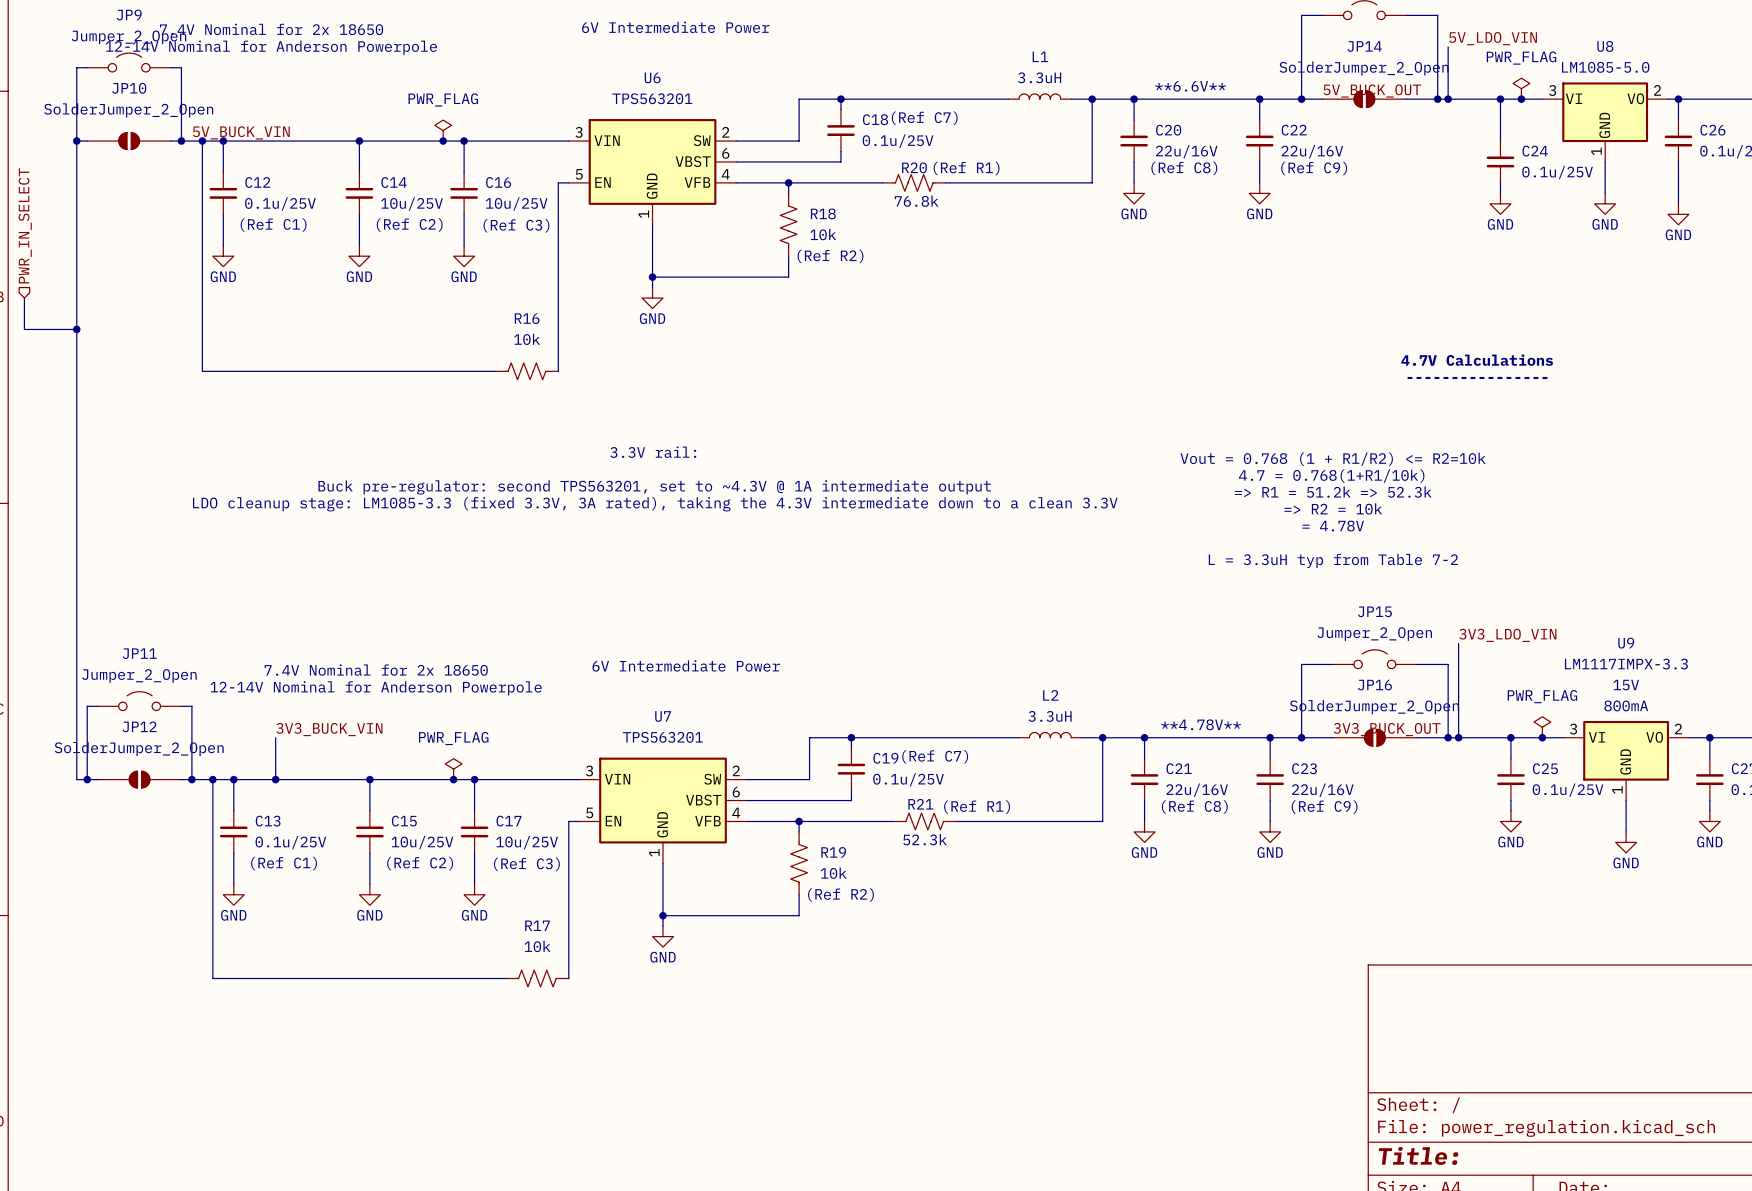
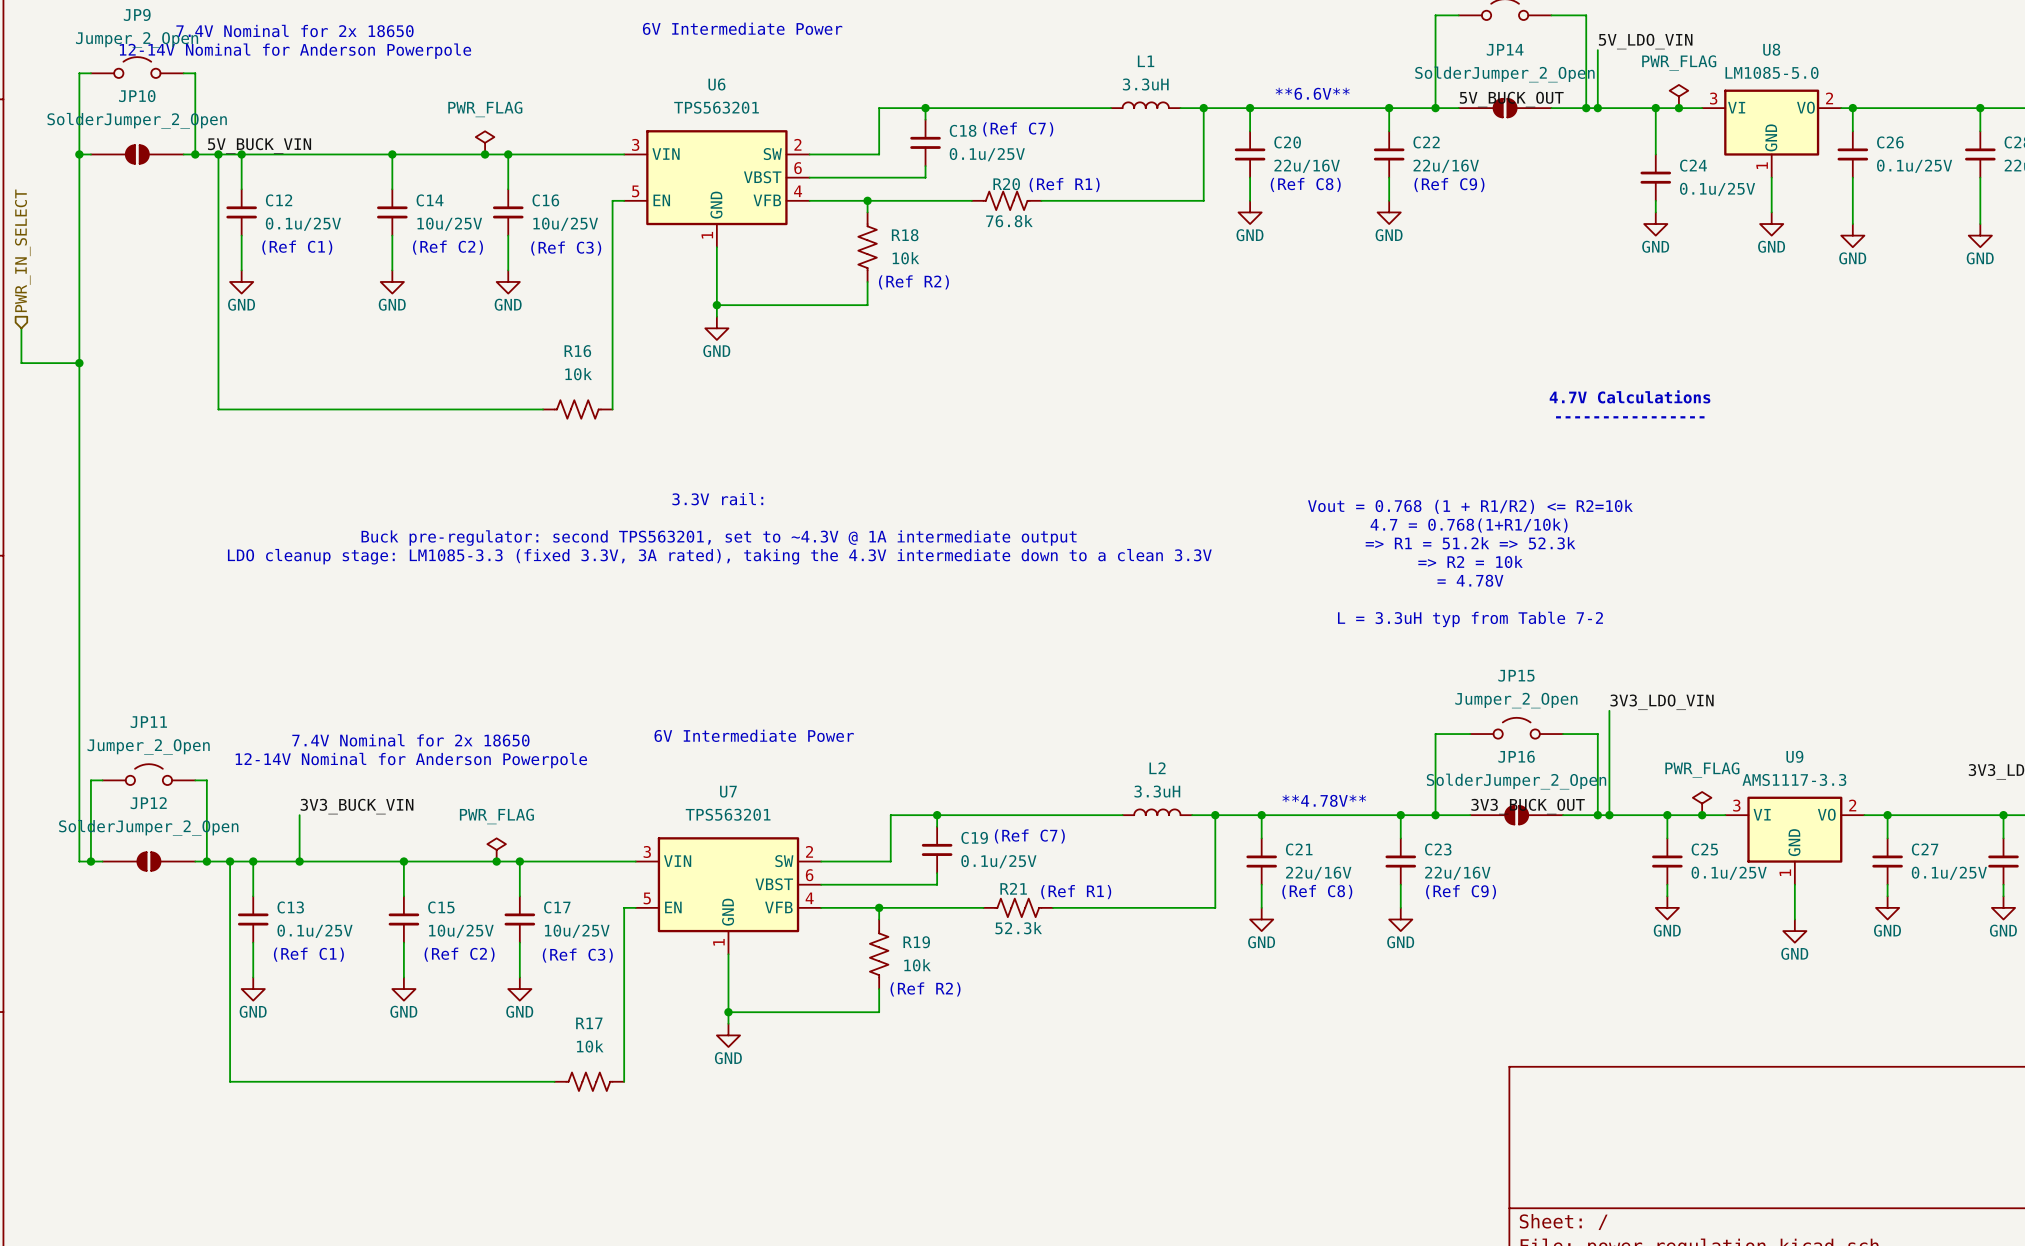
U9 name position: U9 (1626, 643) -> U9 (1794, 756)
U9 value: LM1117IMPX-3.3 (1626, 664) -> AMS1117-3.3 (1794, 779)
U9 text: 15V (1626, 685) -> none
U9 text: 800mA (1626, 705) -> none

